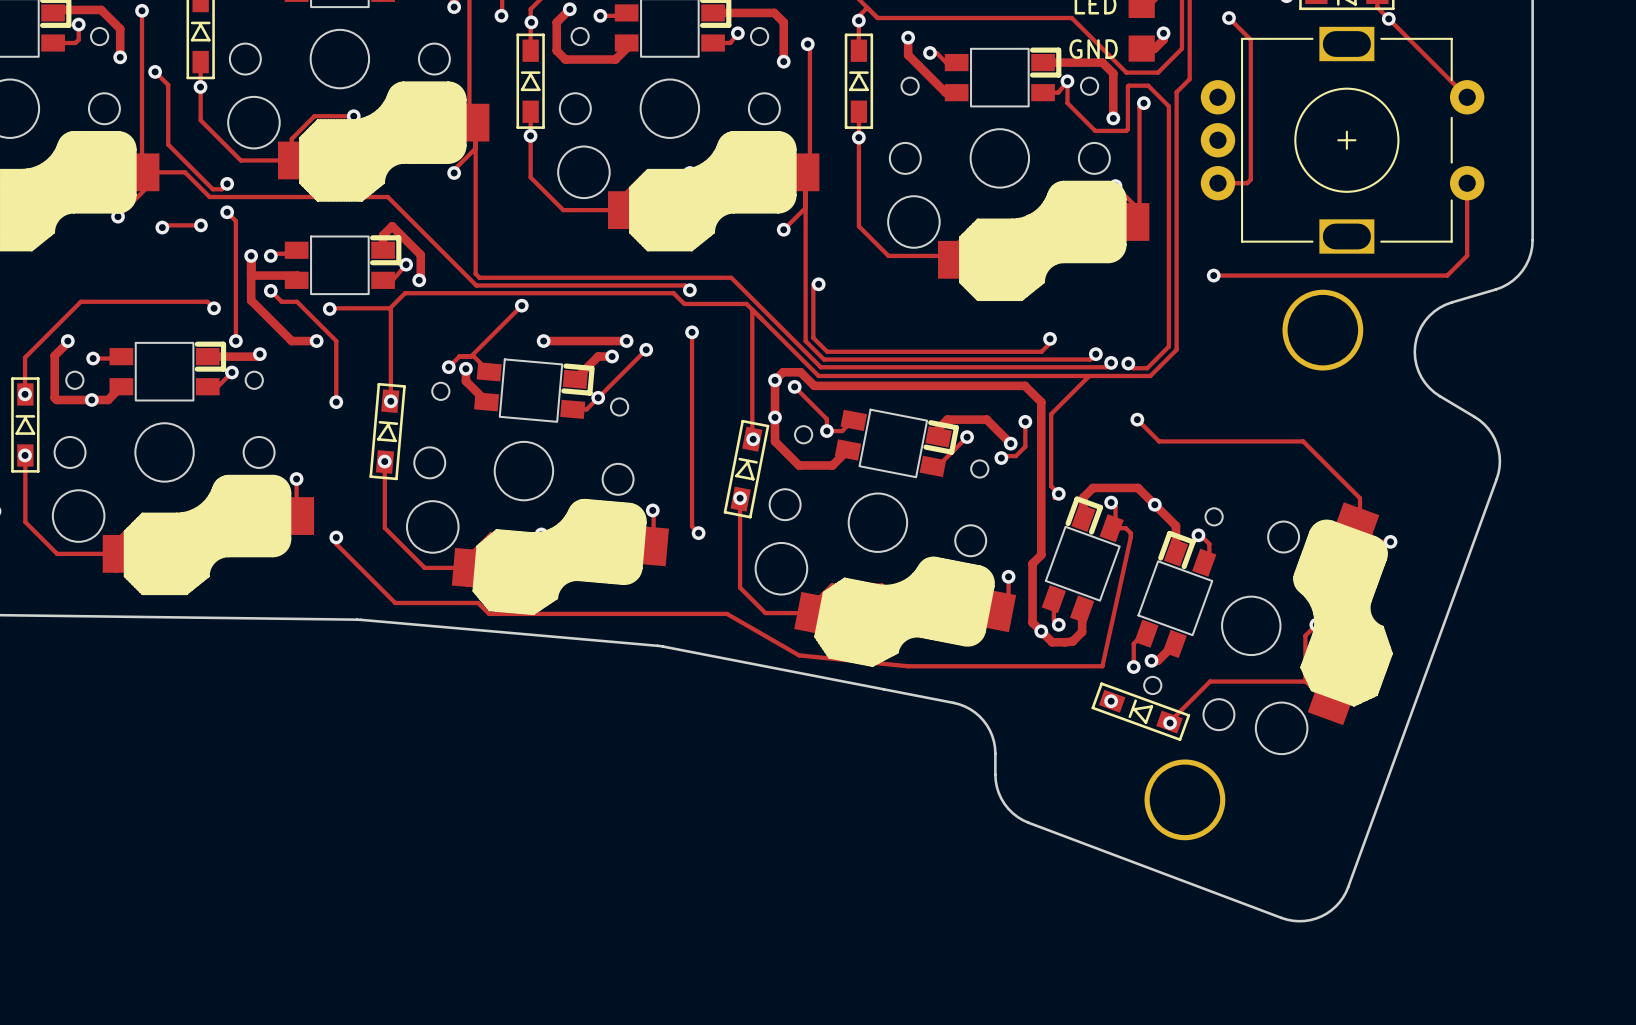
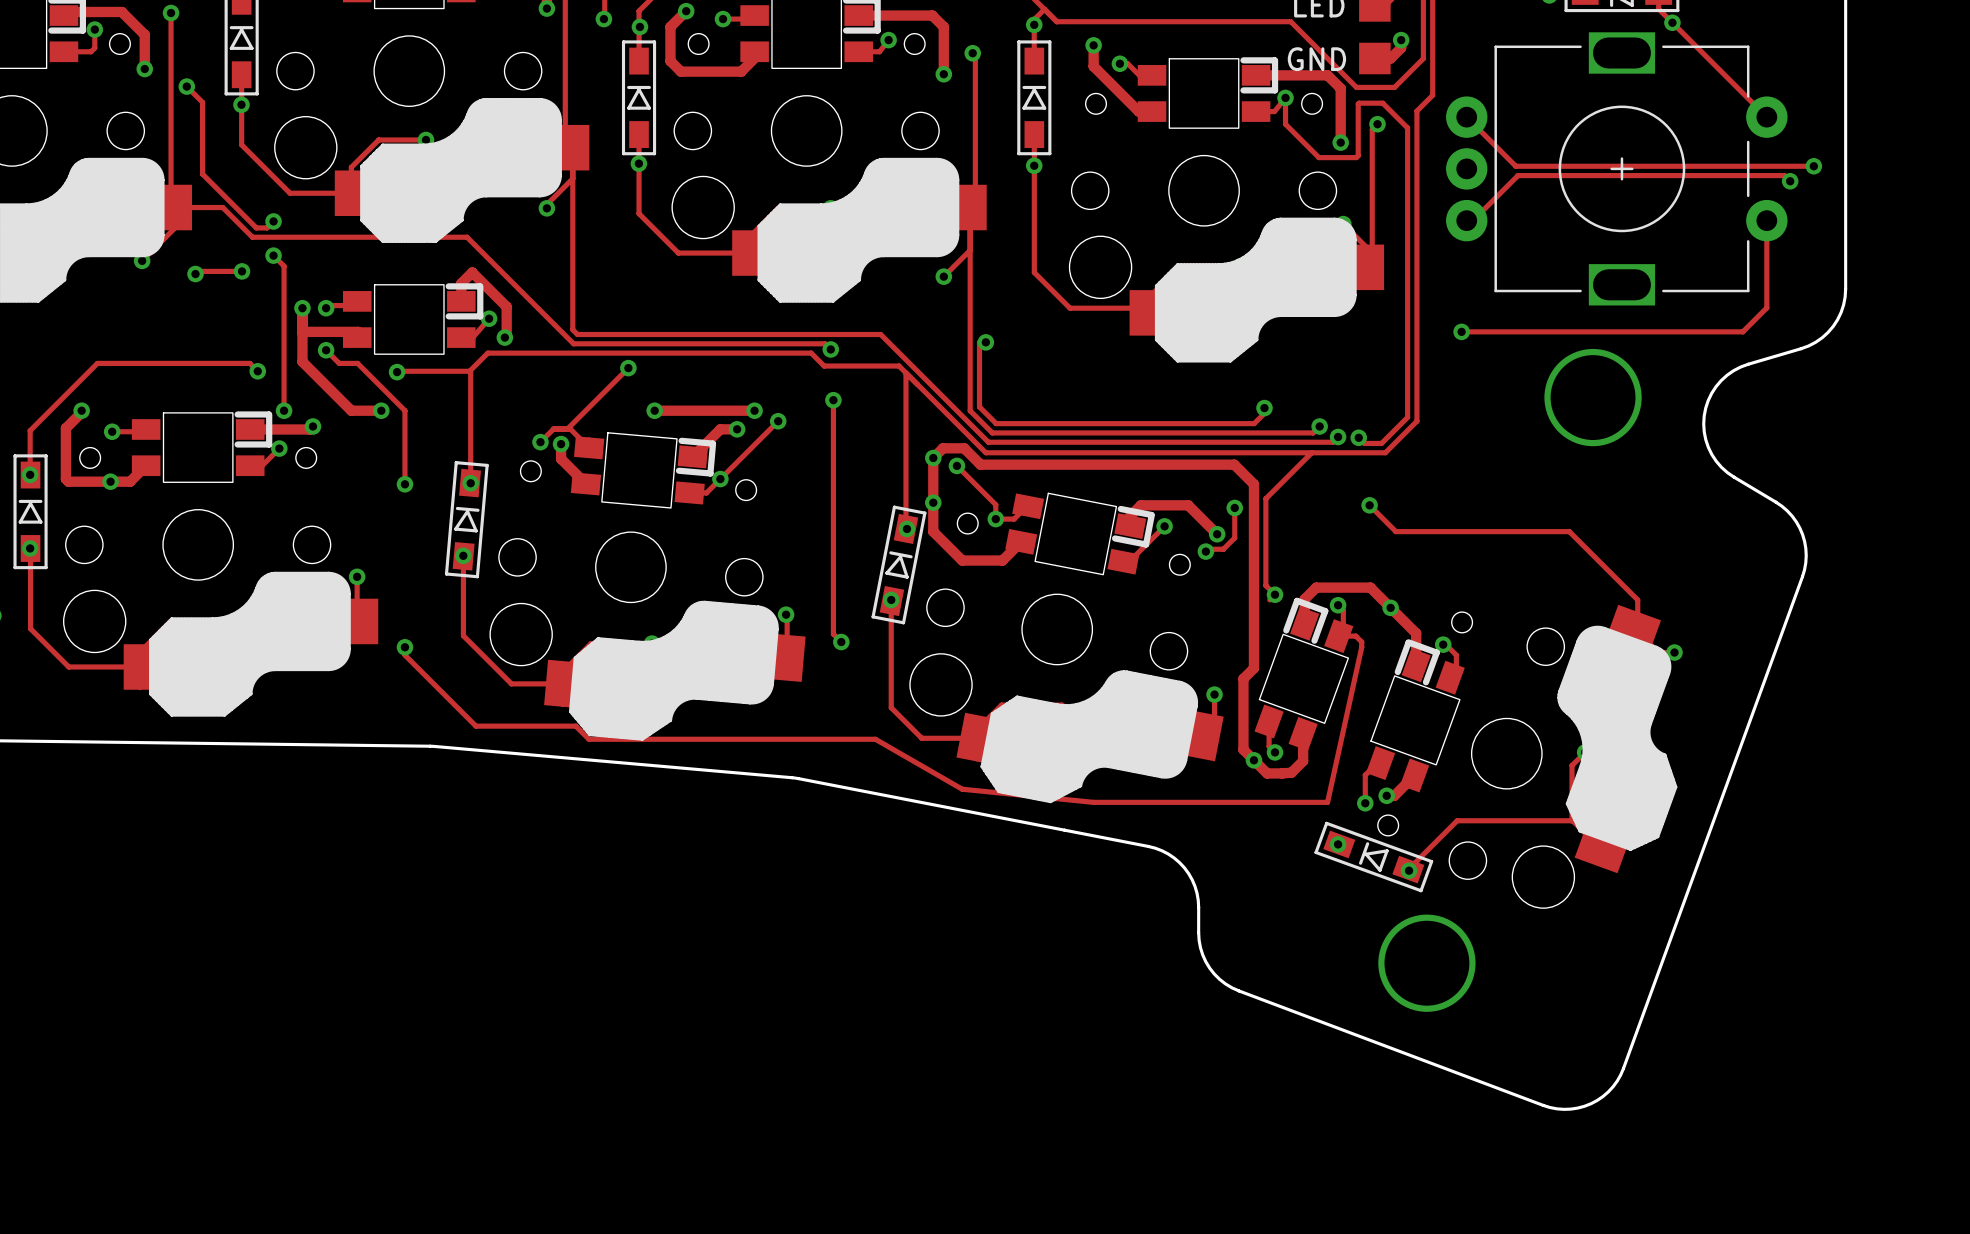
track: (1229, 18) (1250, 39) (1250, 179) (1247, 183) (1223, 183) -> (1790, 181) (1784, 175) (1518, 175) (1472, 220)
via: (1229, 18) -> none
track: none -> (1466, 117) (1515, 166) (1813, 166)
via: none -> (1813, 166)
via: none -> (1790, 181)

